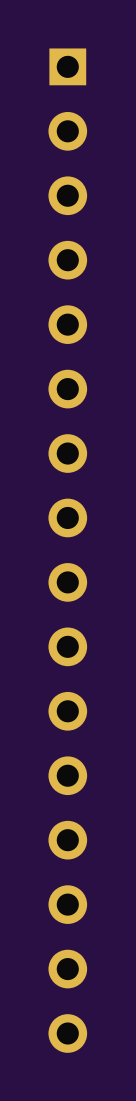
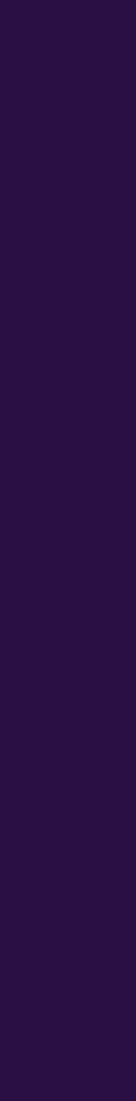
part: (67, 550) -> none

